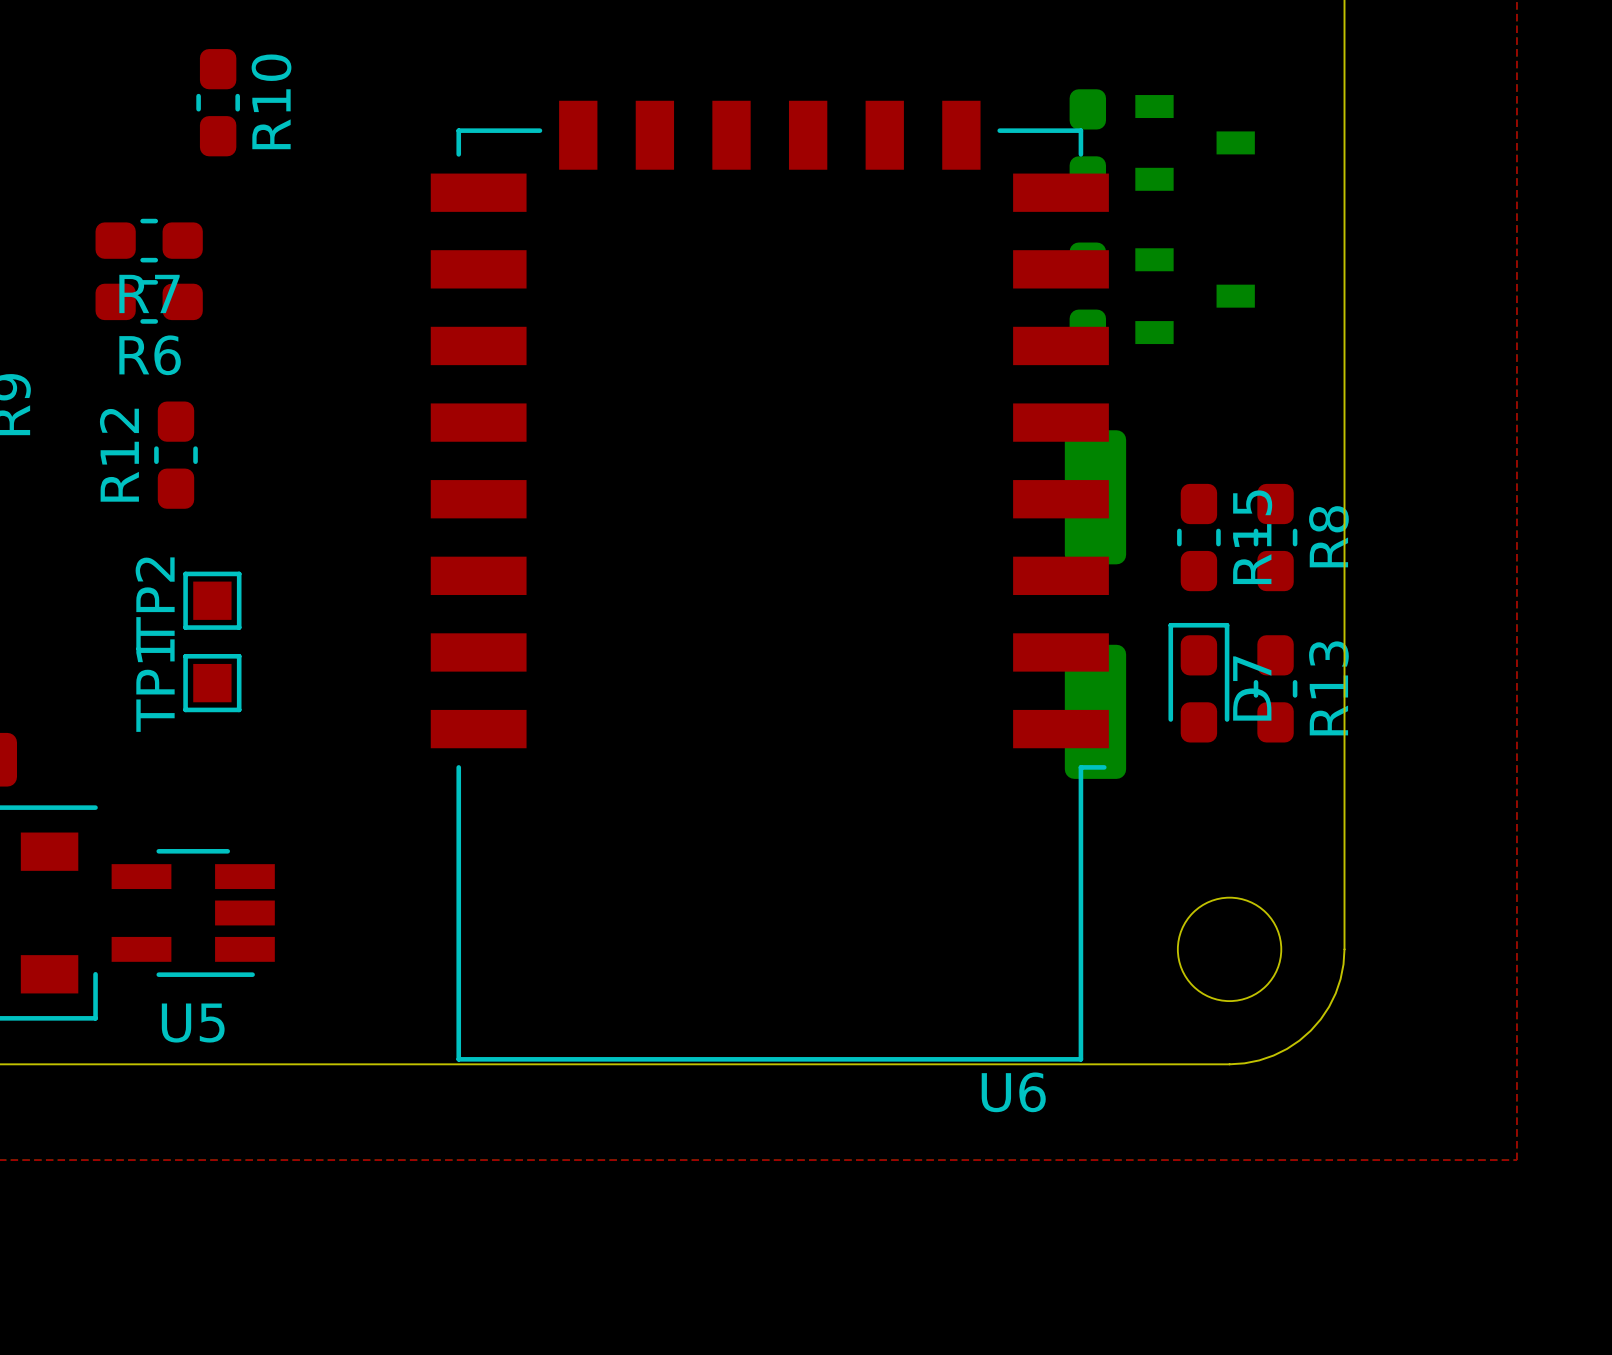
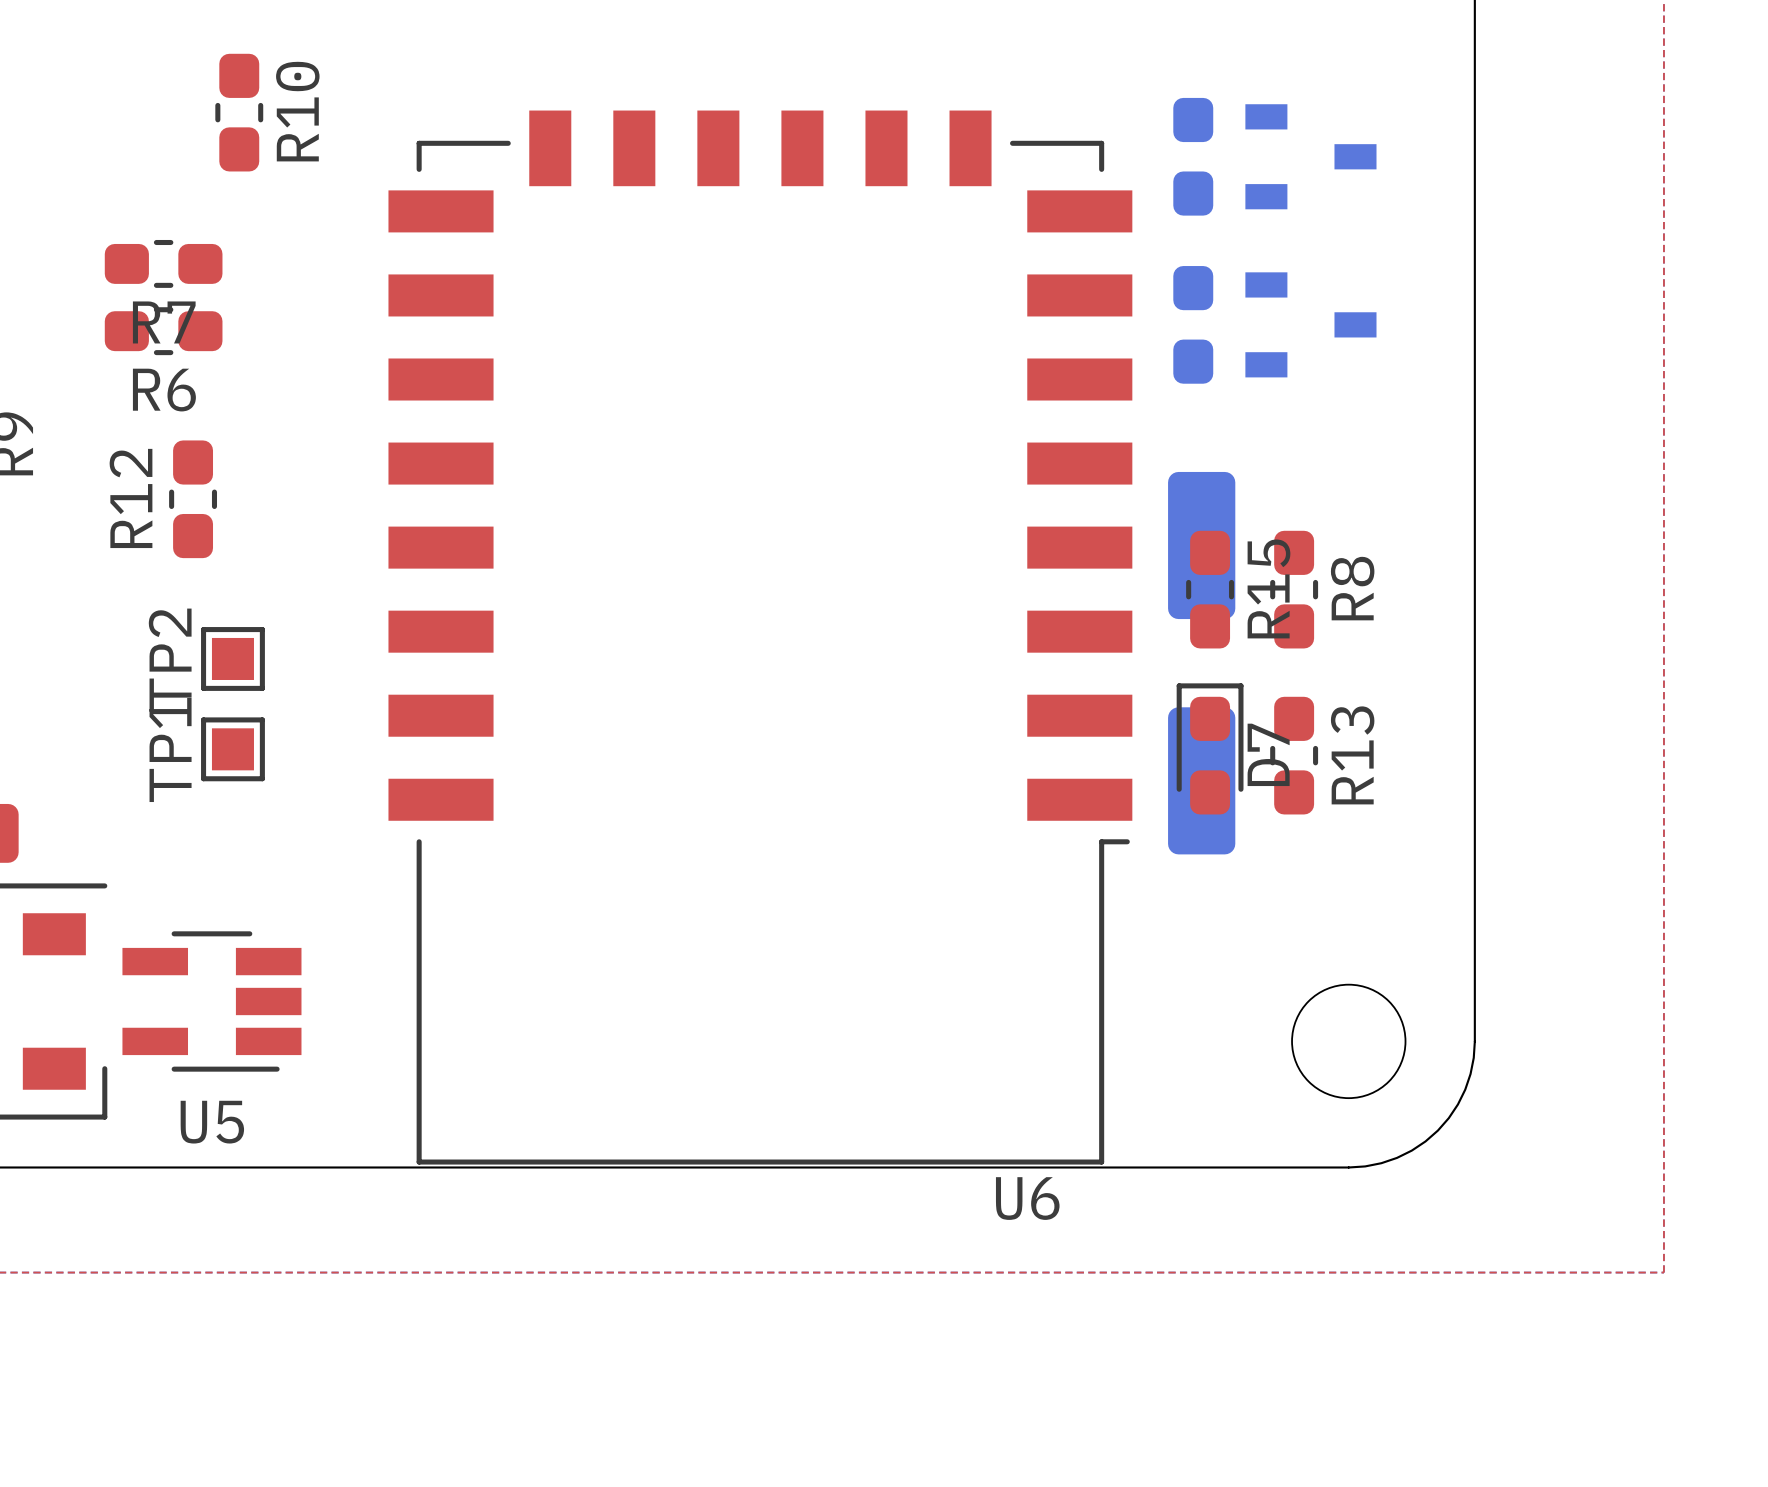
R15 position: (1198, 537) -> (1210, 589)
R8 position: (1275, 537) -> (1294, 589)
U6 position: (769, 581) -> (760, 637)
D7 position: (1198, 682) -> (1210, 748)
R13 position: (1275, 688) -> (1294, 755)

